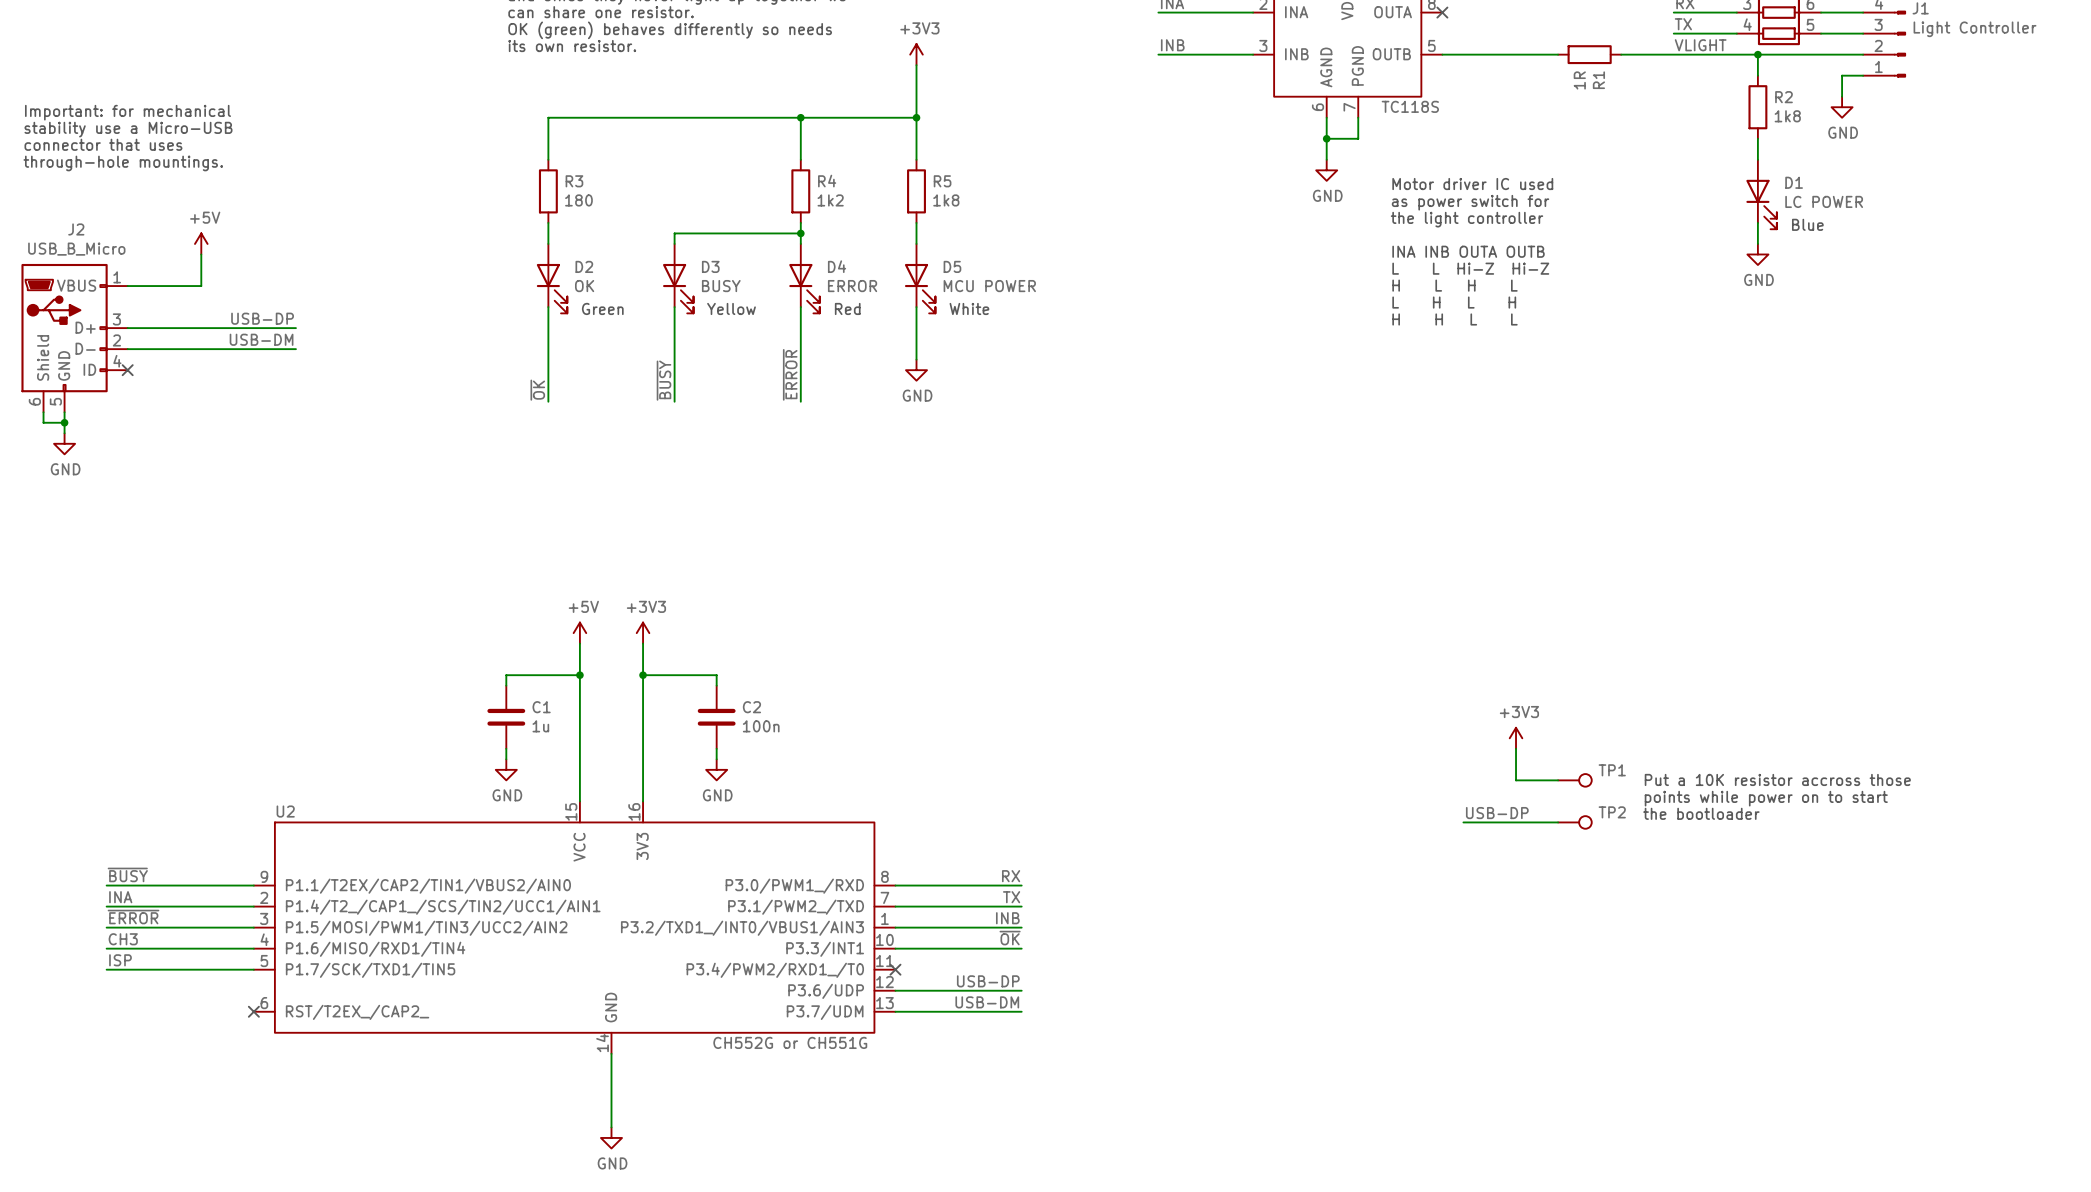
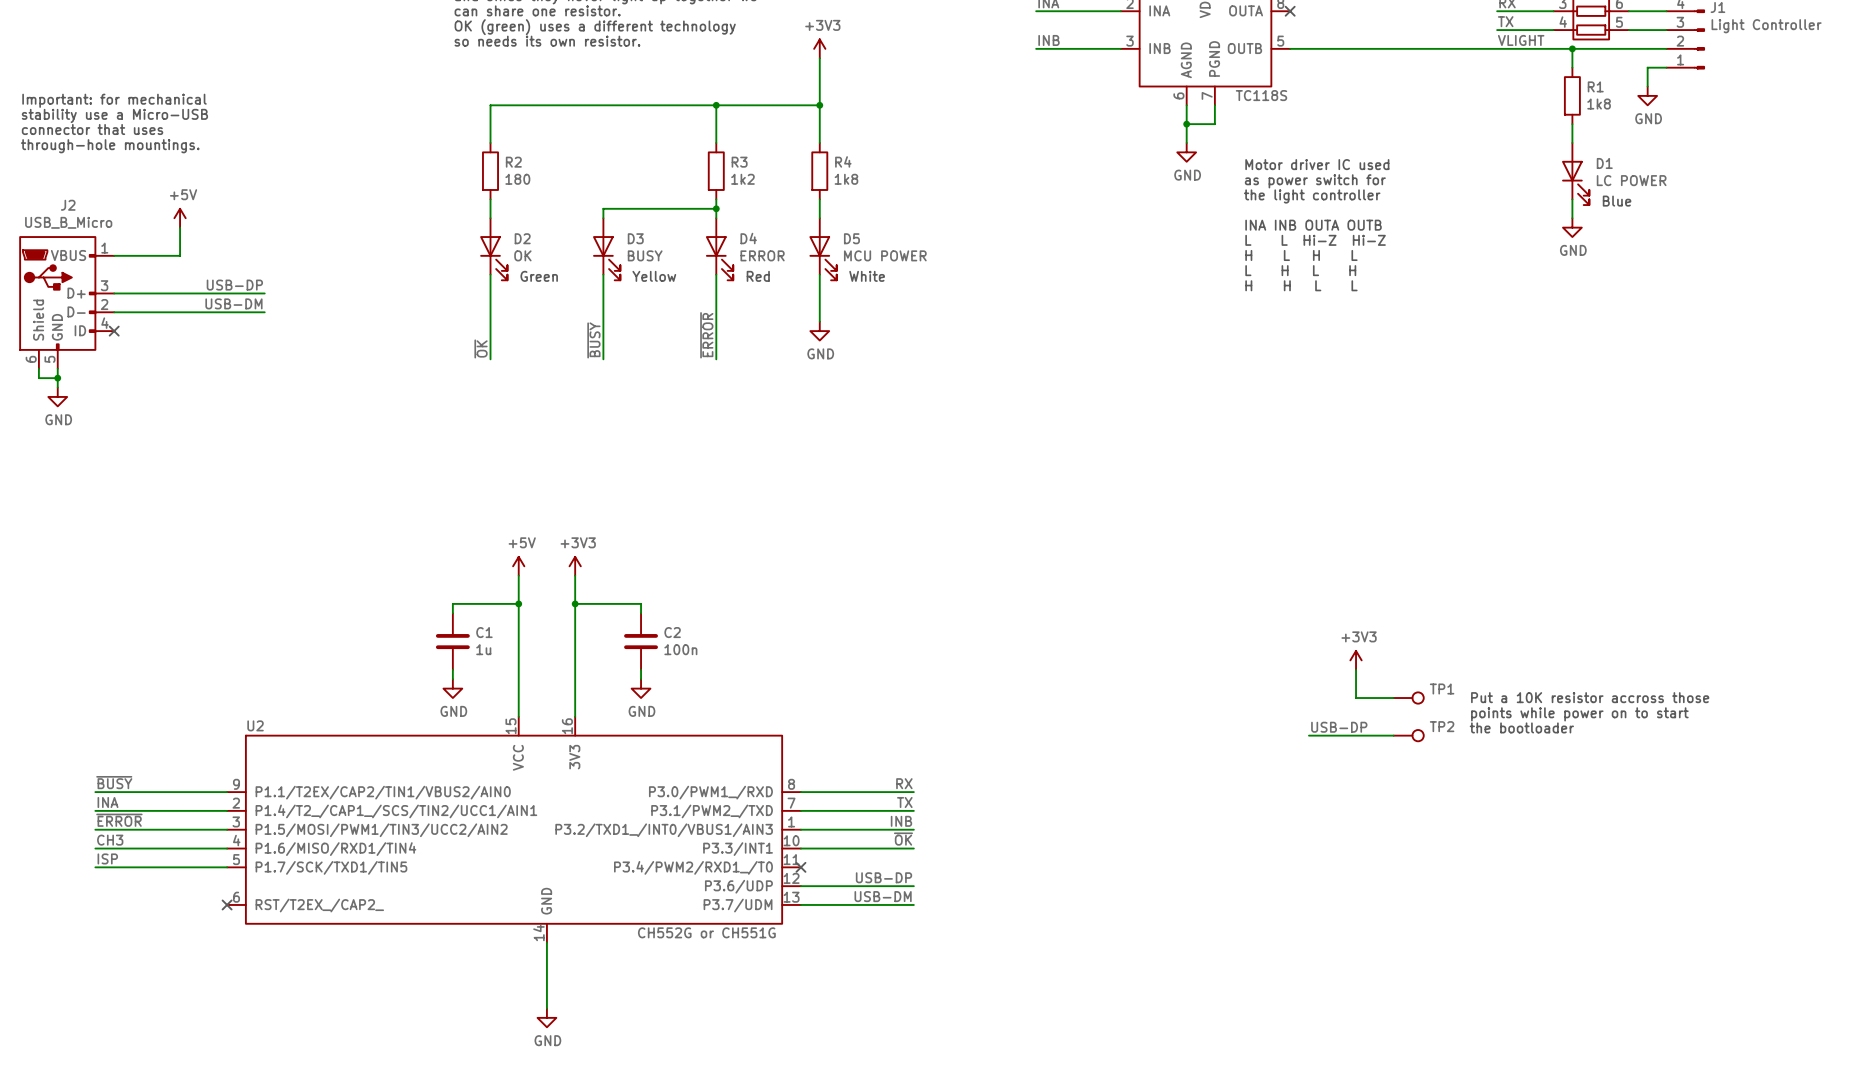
text: OK (green) behaves differently so needs (670, 30) -> OK (green) uses a different technology (595, 27)
text: its own resistor. (572, 46) -> so needs its own resistor. (547, 41)
wire: none -> (1393, 48) (1450, 48)
R1: 1R (1589, 54) -> none
R2 name: R2 (1784, 97) -> R1 (1595, 86)
R3 name: R3 (574, 181) -> R2 (513, 162)
R4 name: R4 (827, 181) -> R3 (739, 162)
R5 name: R5 (942, 181) -> R4 (843, 161)

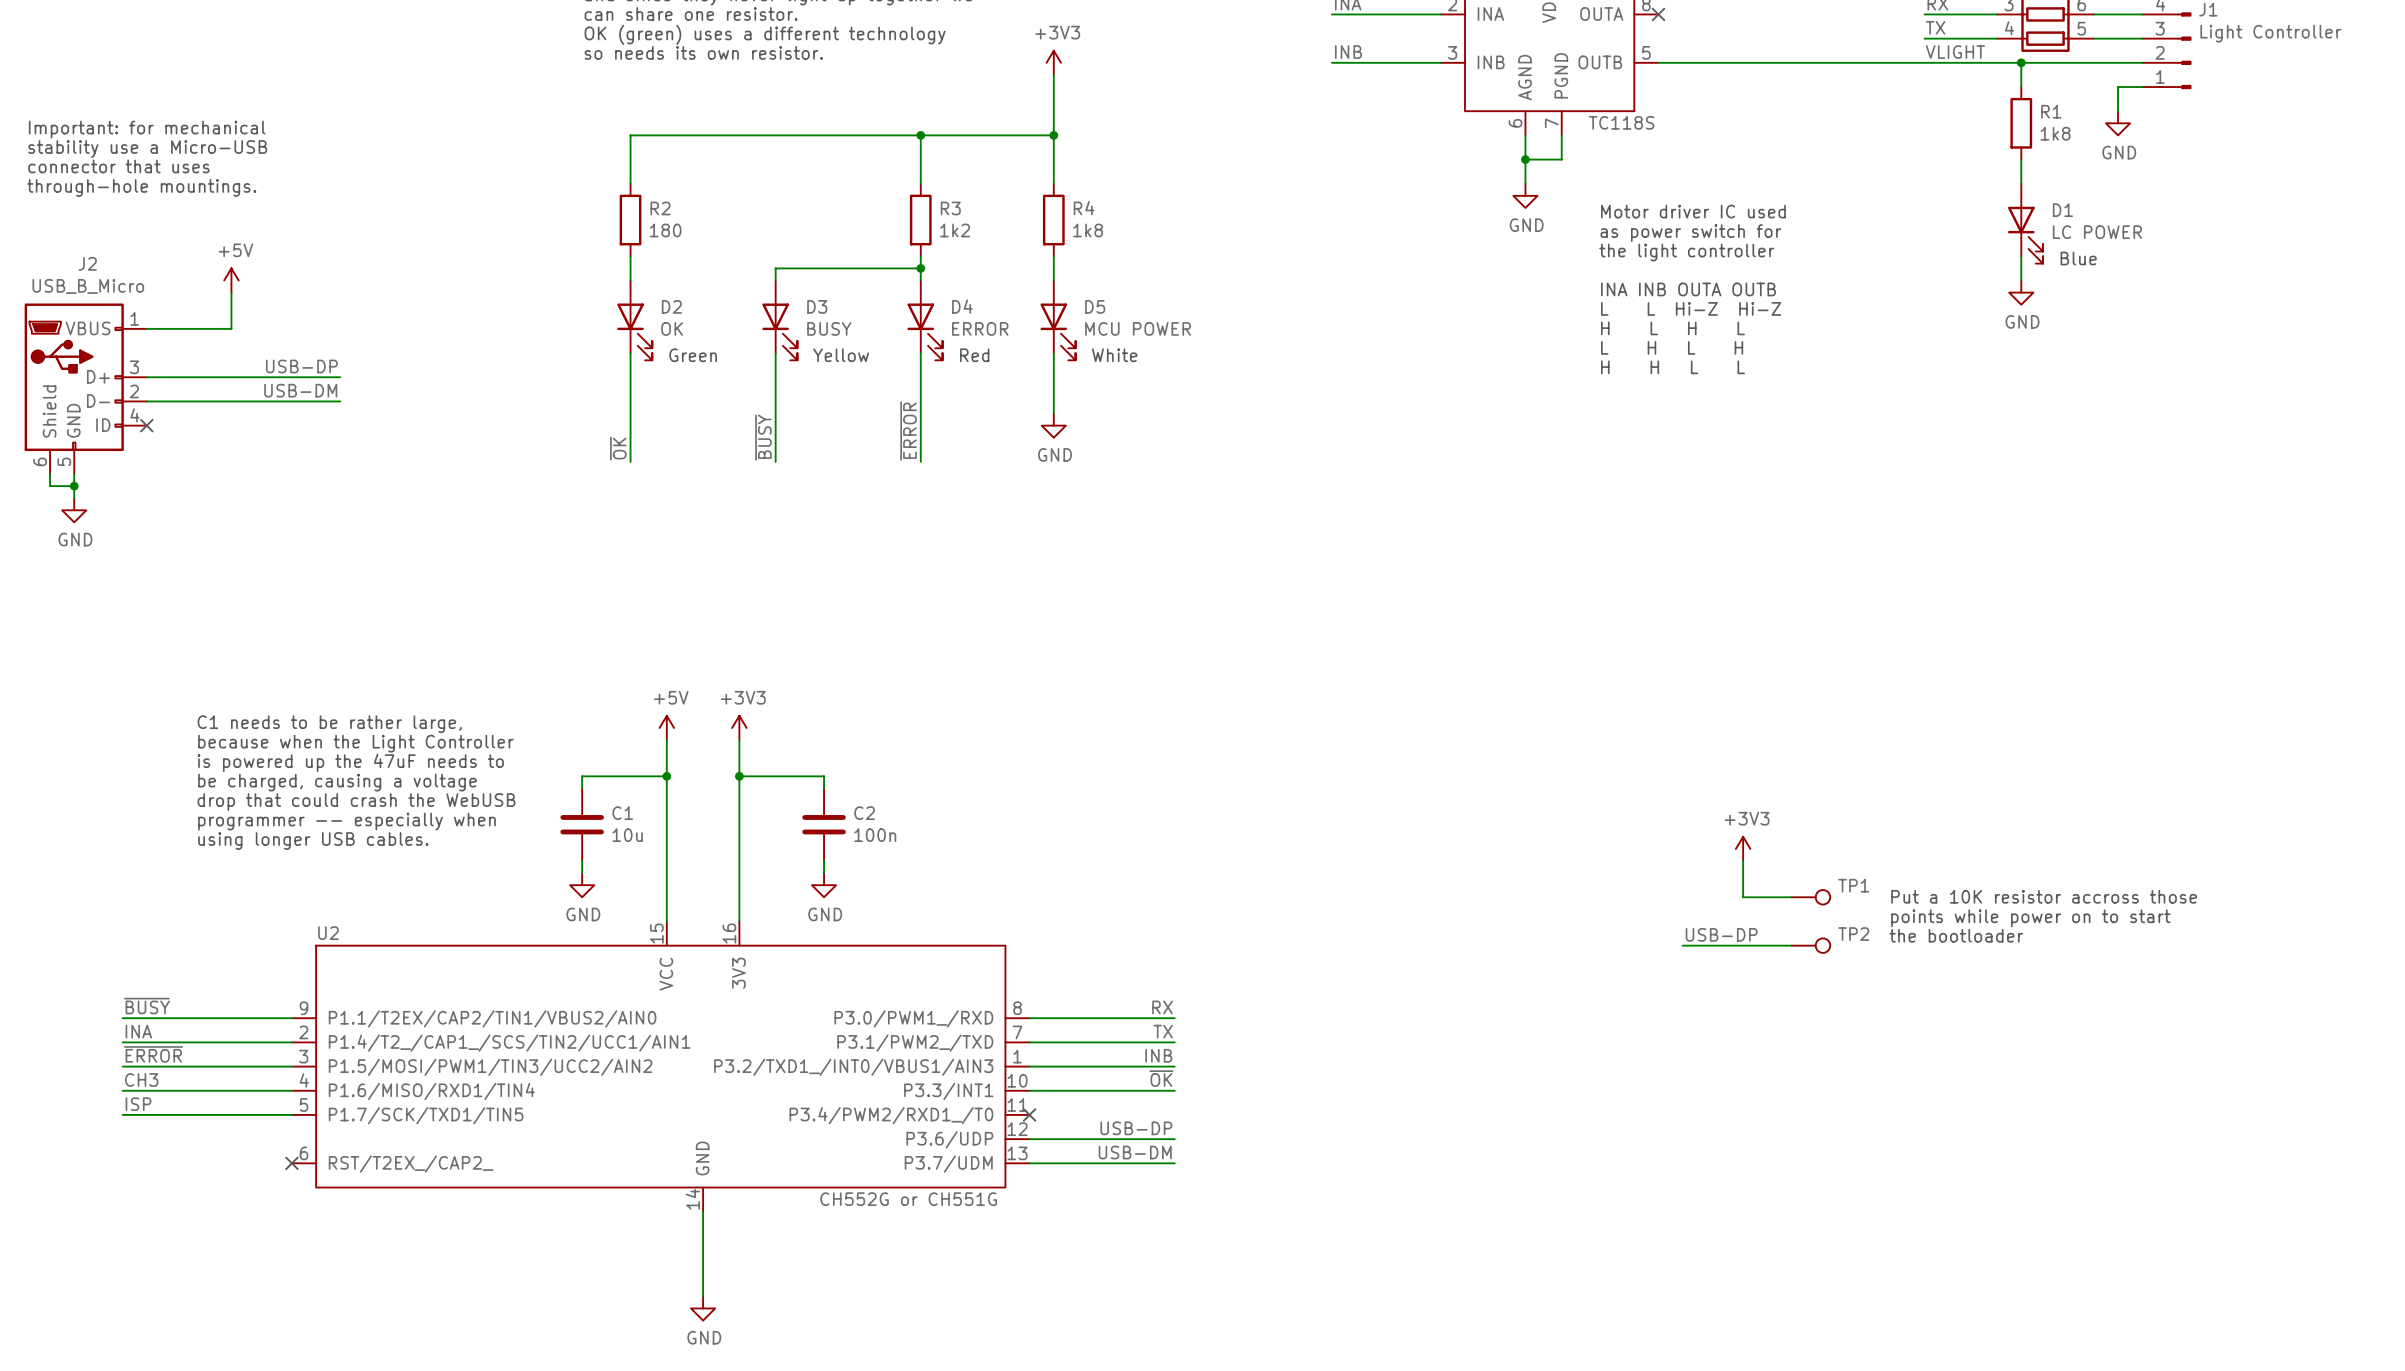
text: none -> C1 needs to be rather large, (329, 724)
text: none -> because when the Light Controller (355, 743)
text: none -> is powered up the 47uF needs to (350, 762)
text: none -> be charged, causing a voltage (337, 782)
text: none -> drop that could crash the WebUSB (356, 802)
text: none -> programmer -- especially when (347, 821)
C1 value: 1u (483, 649) -> 10u (627, 835)
text: none -> using longer USB cables. (313, 841)

